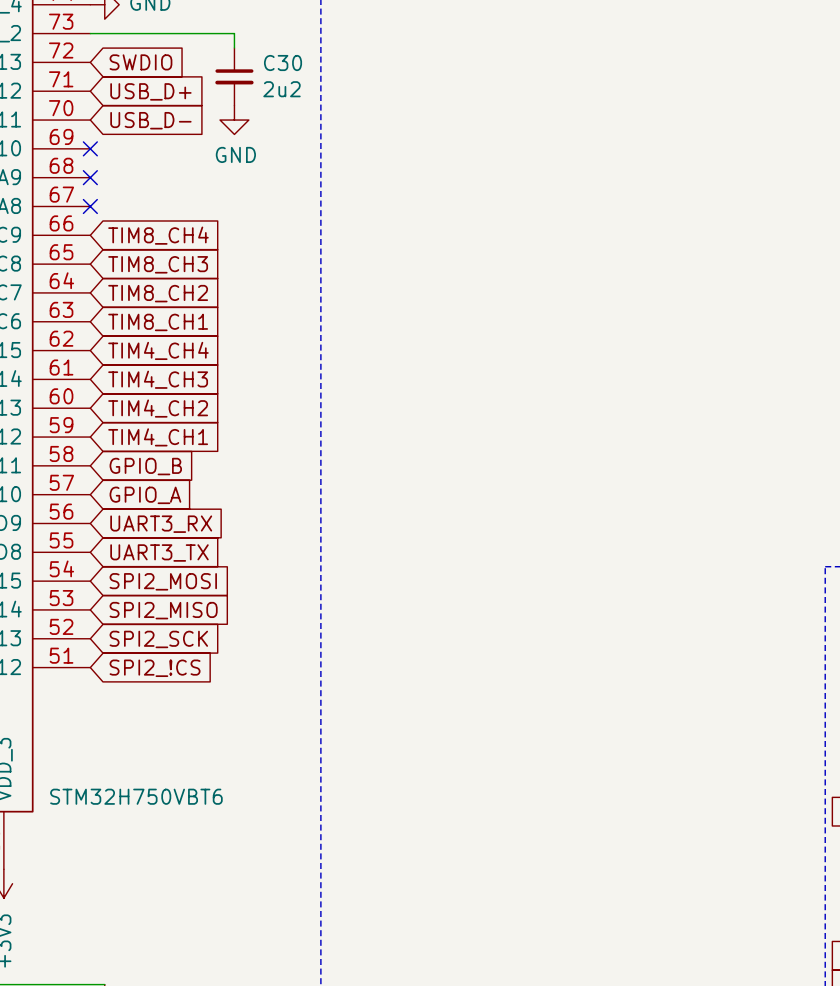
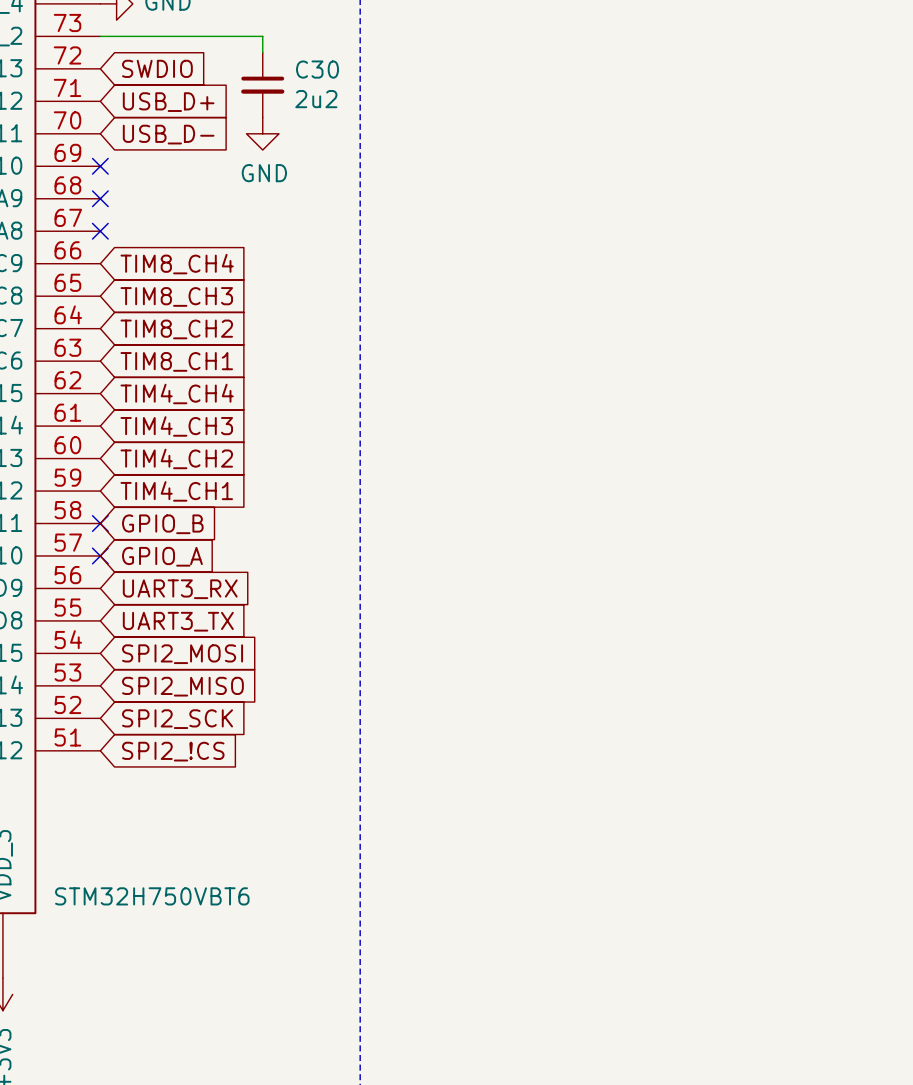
no-connect mark: none -> (100, 523)
no-connect mark: none -> (100, 555)

